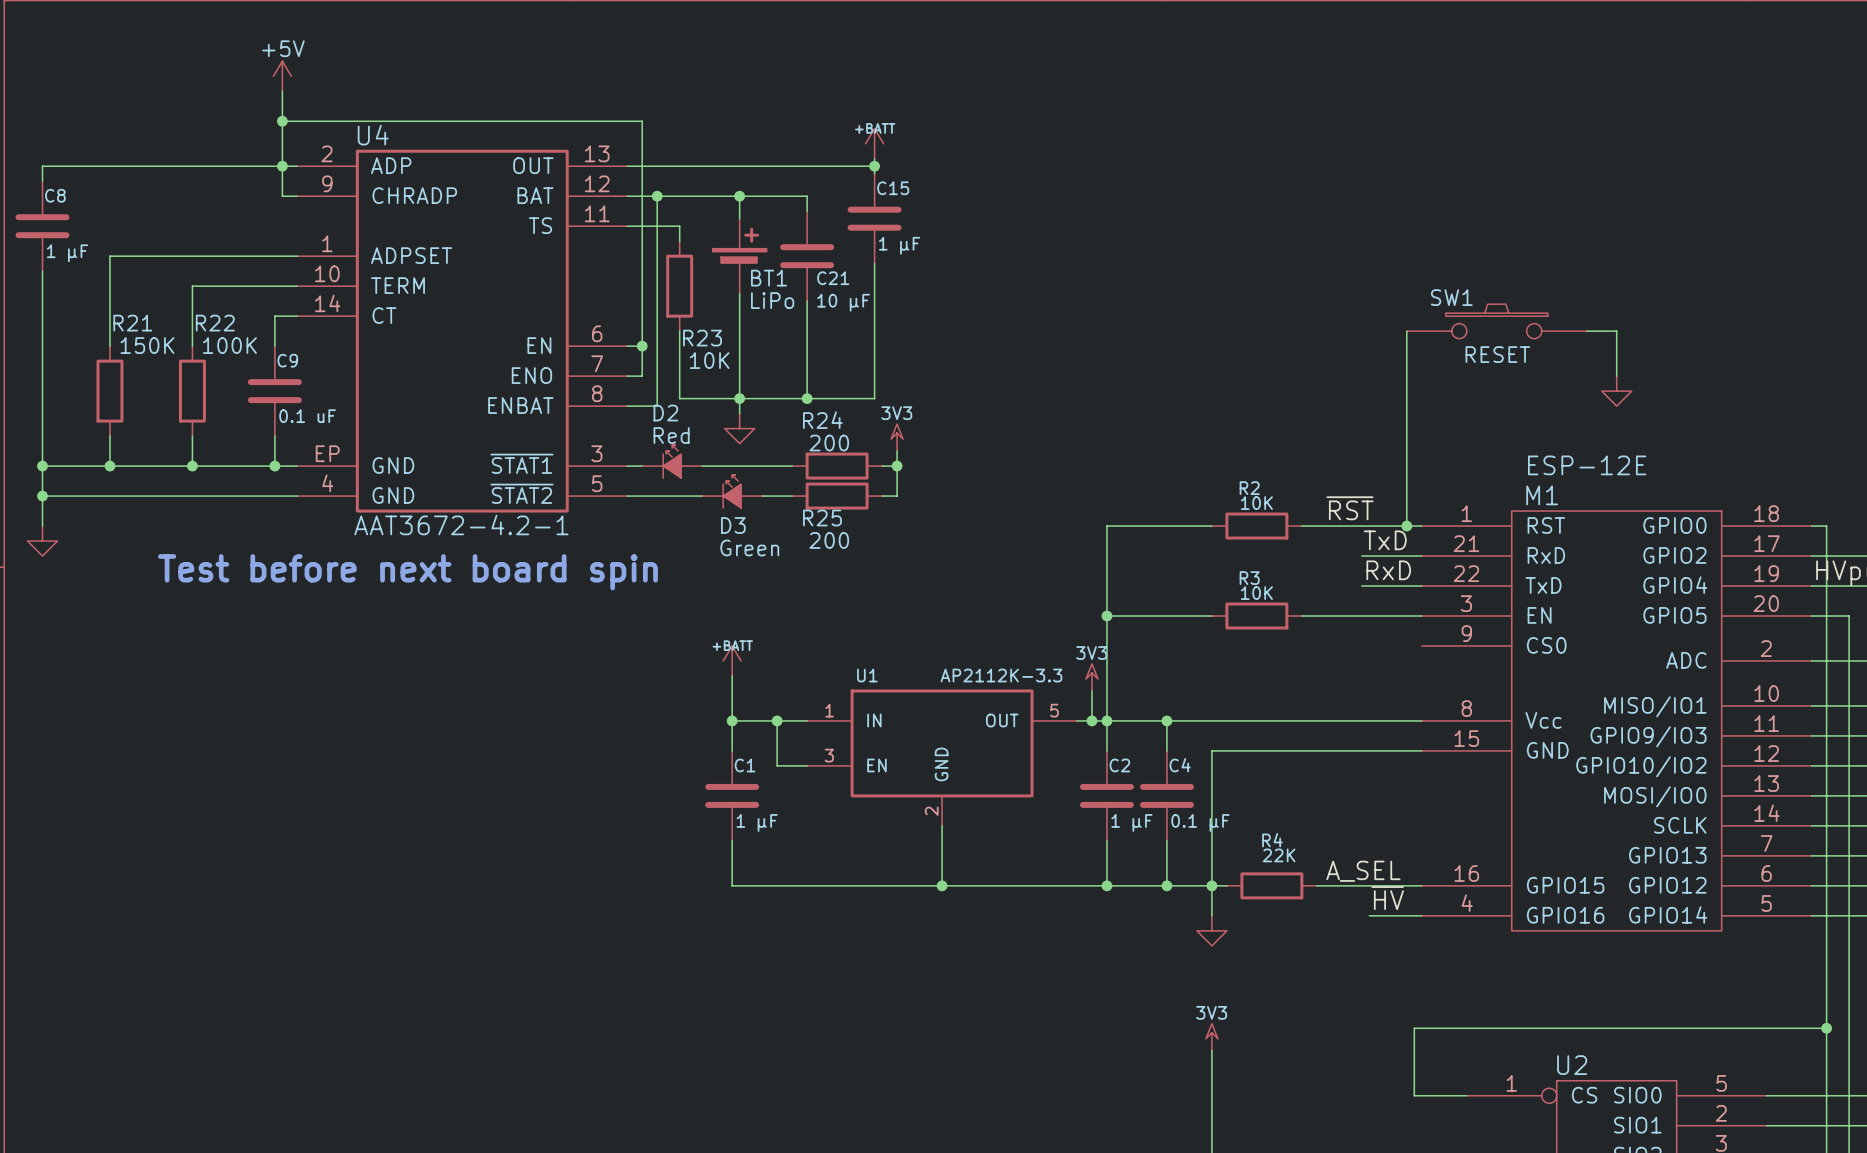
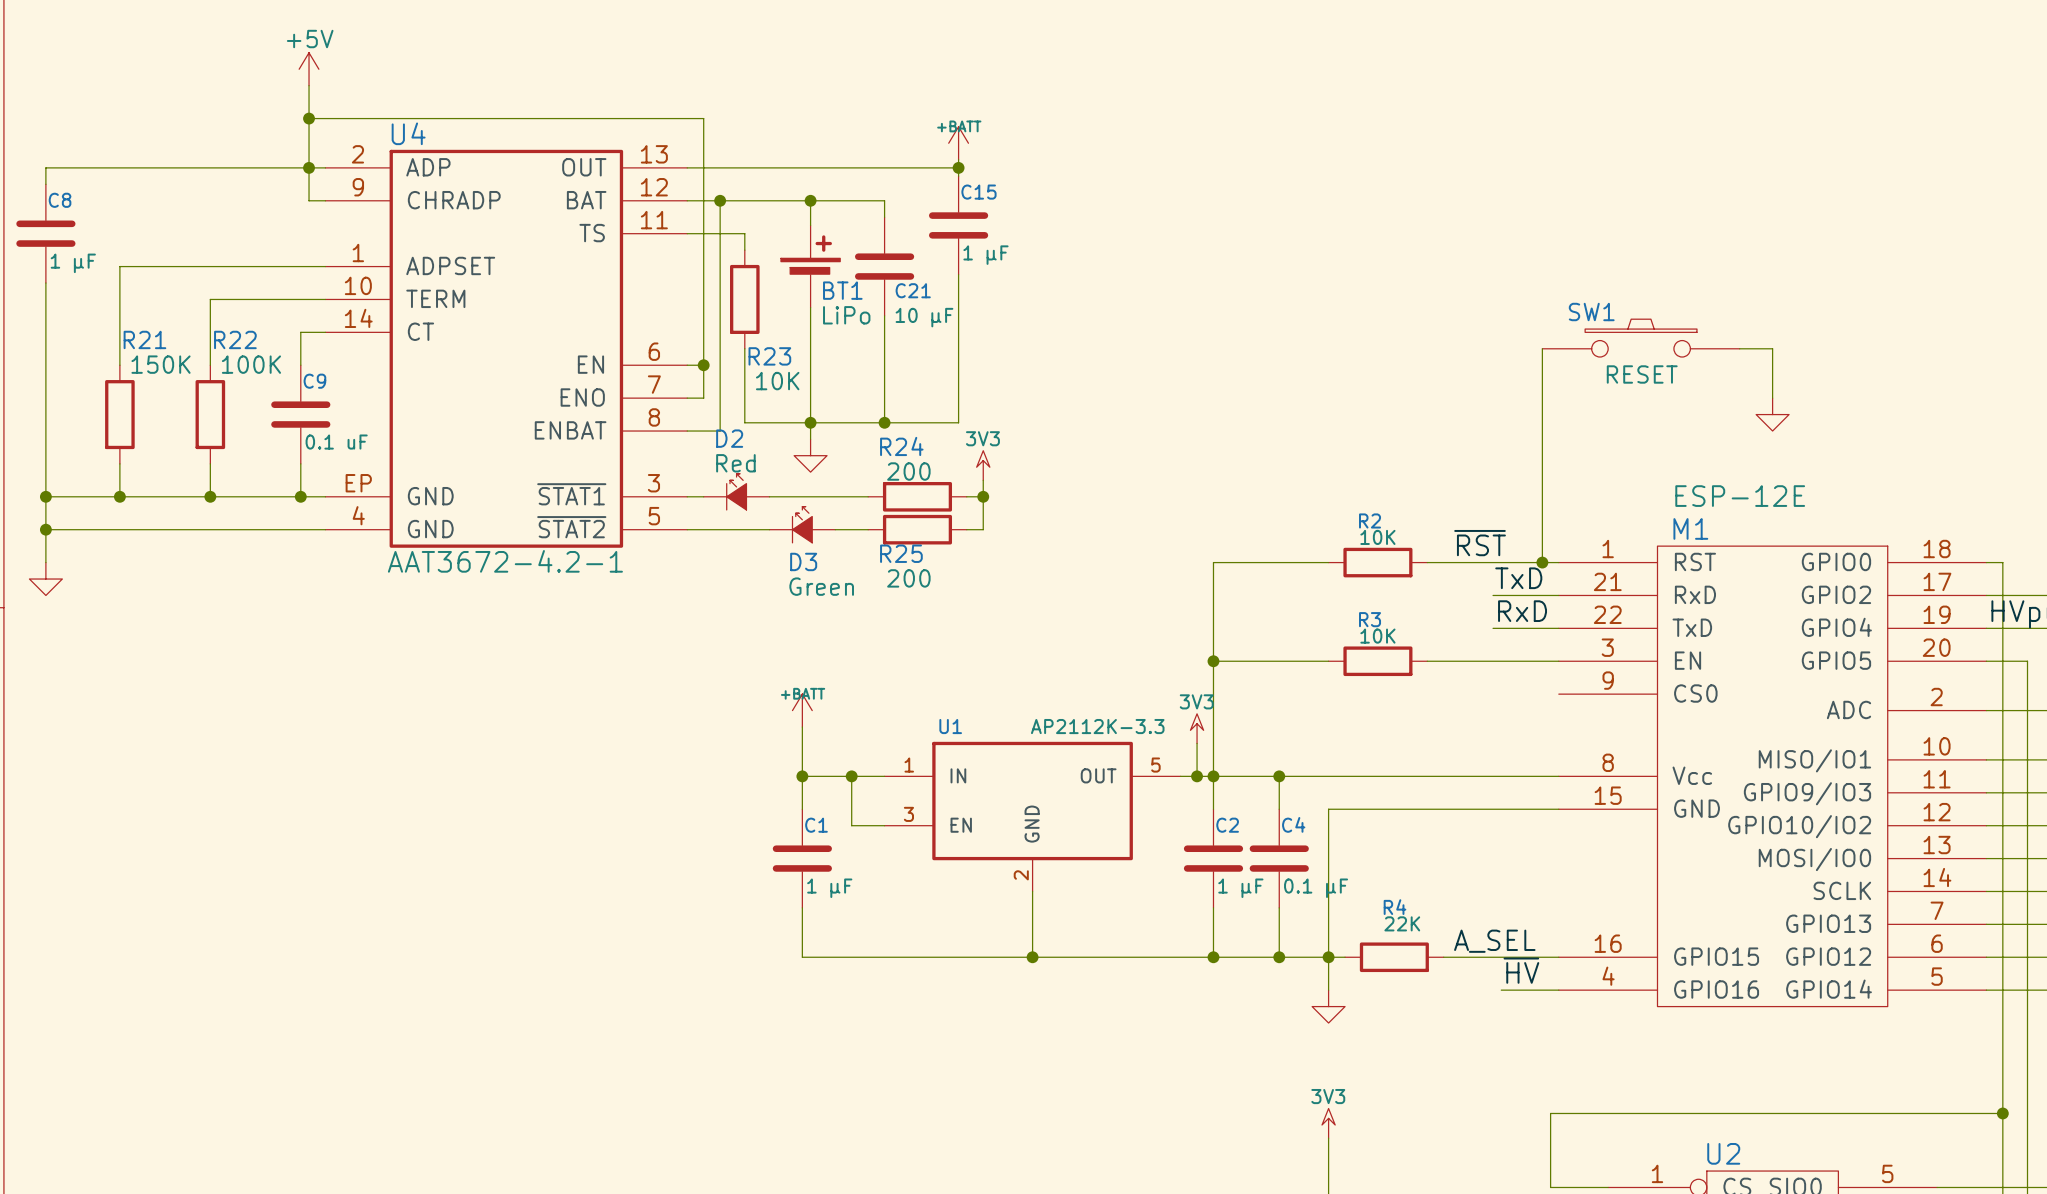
text: Test before next board spin (407, 572) -> none

